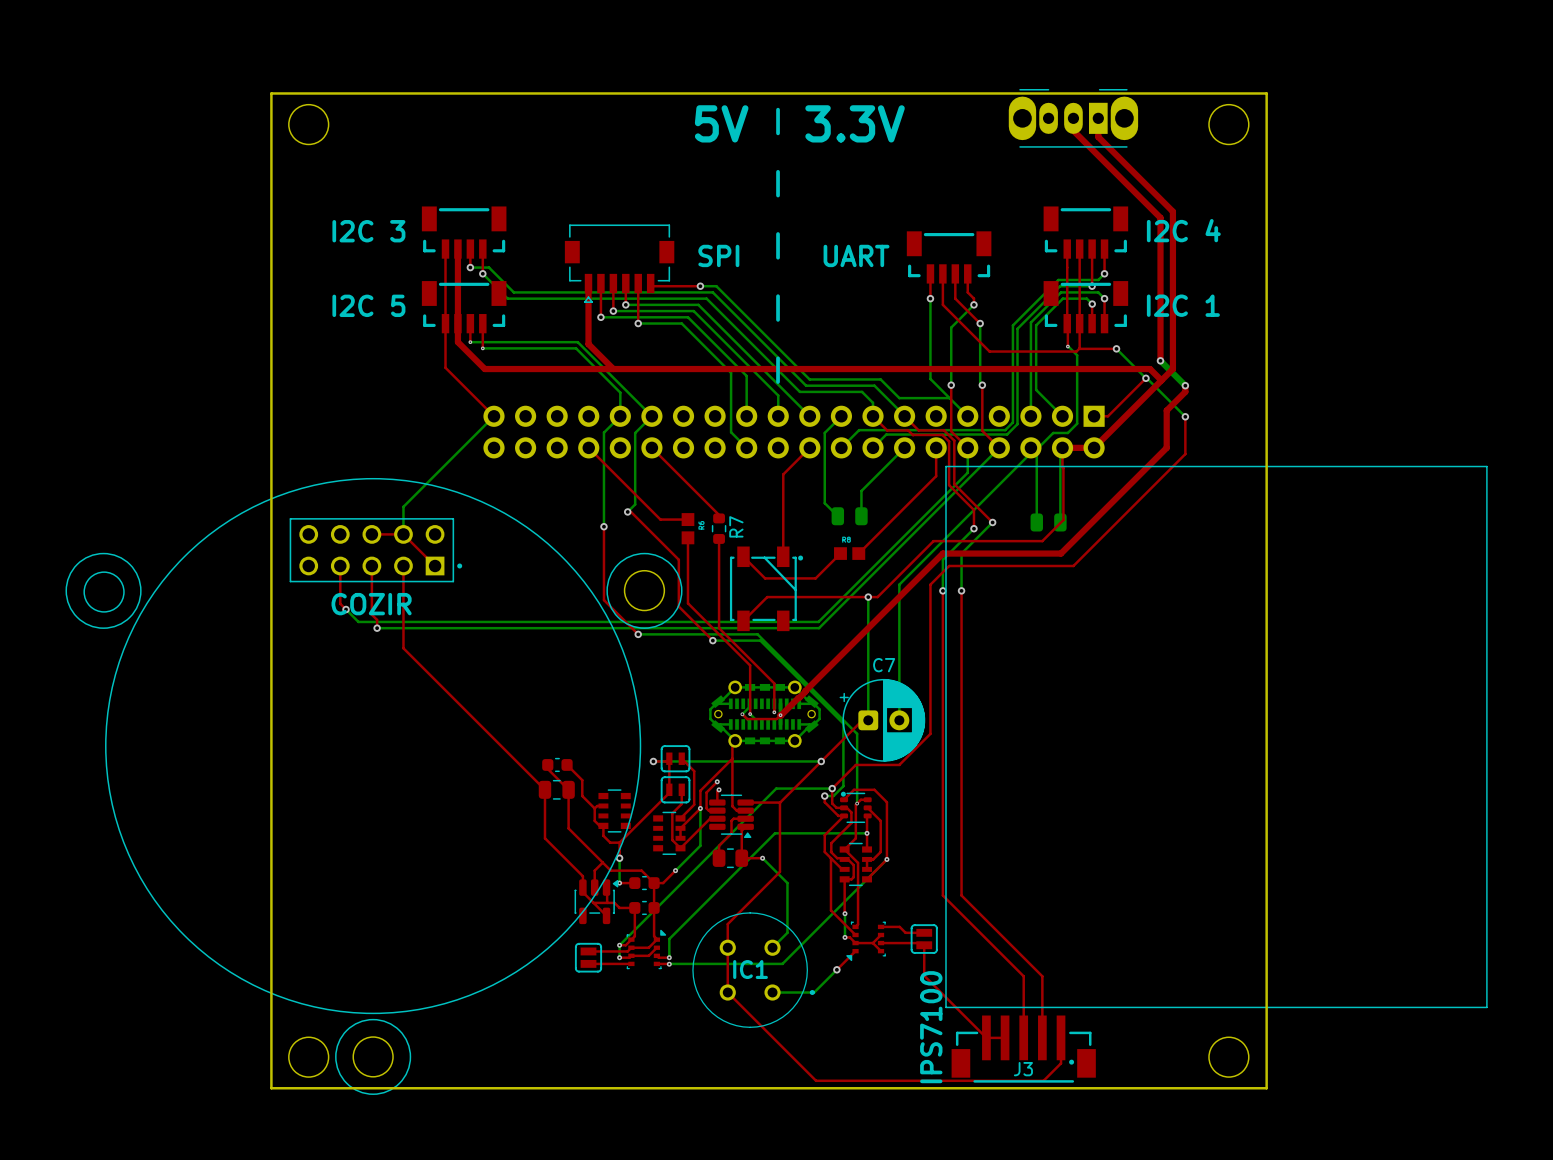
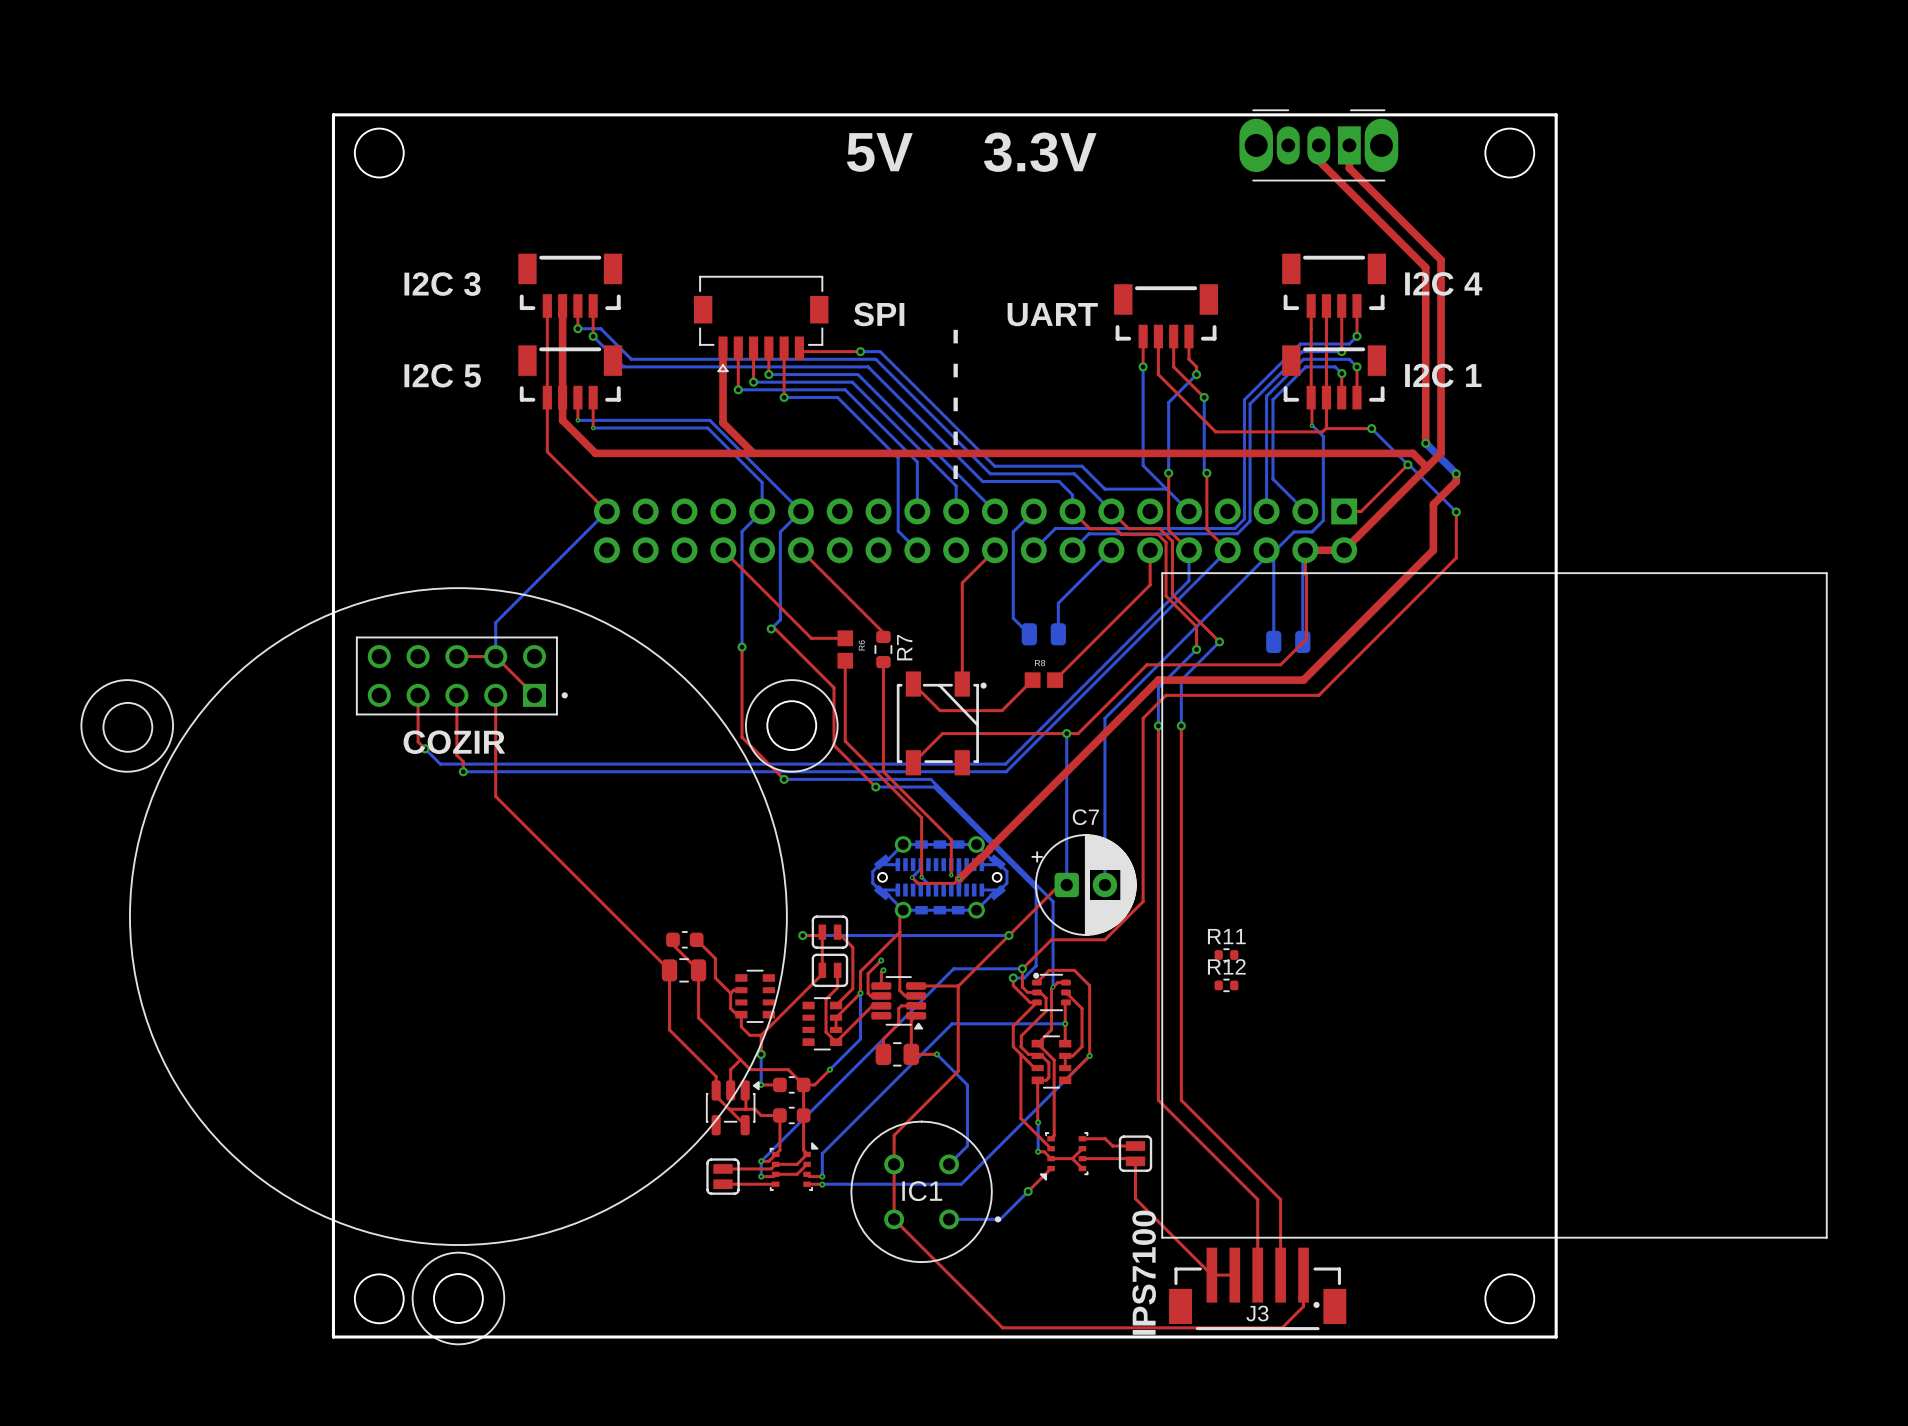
R11: none -> (1226, 955)
R12: none -> (1226, 985)

